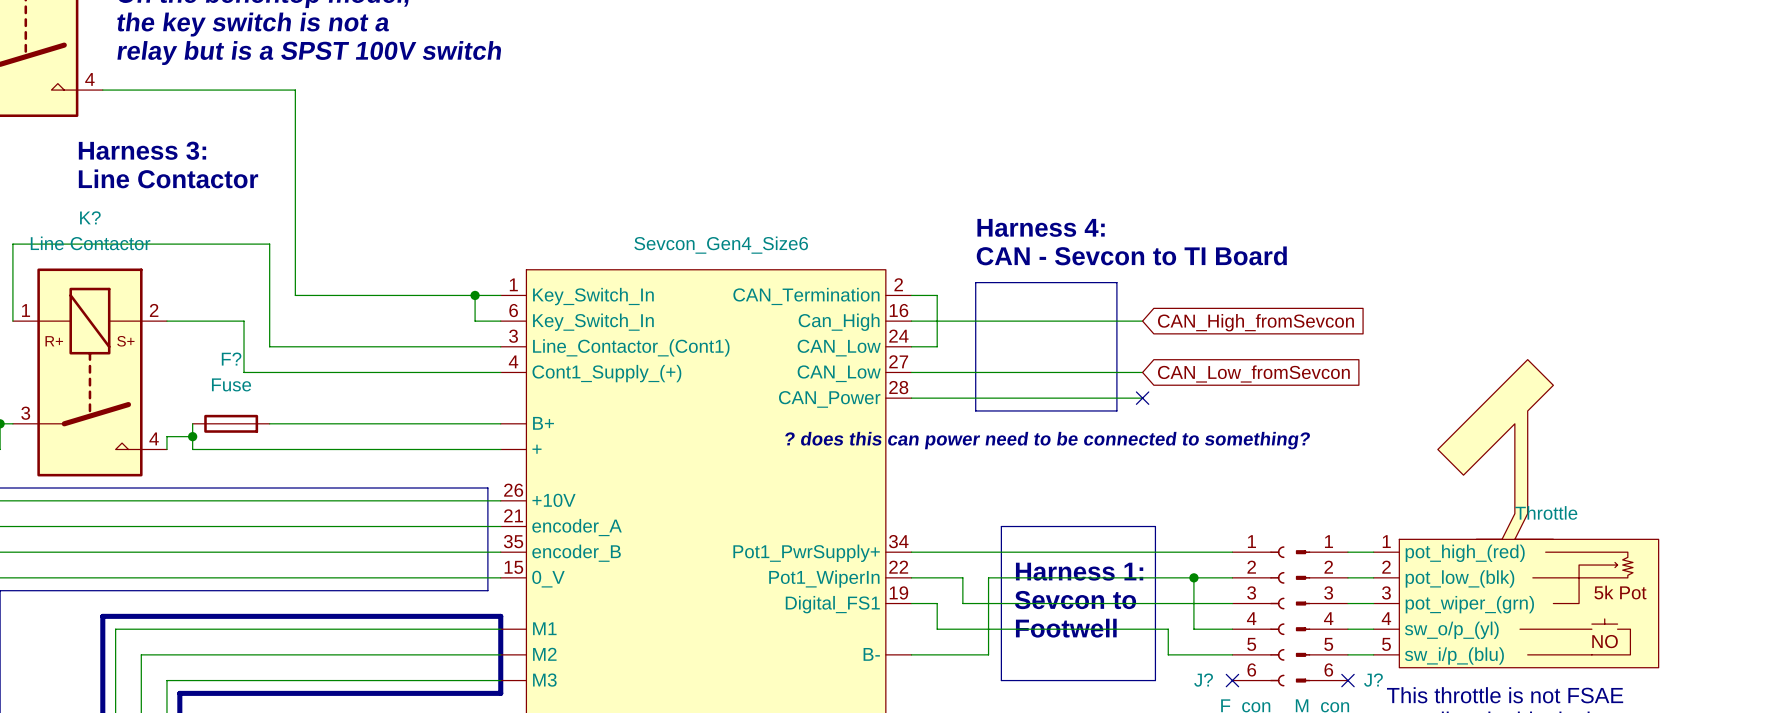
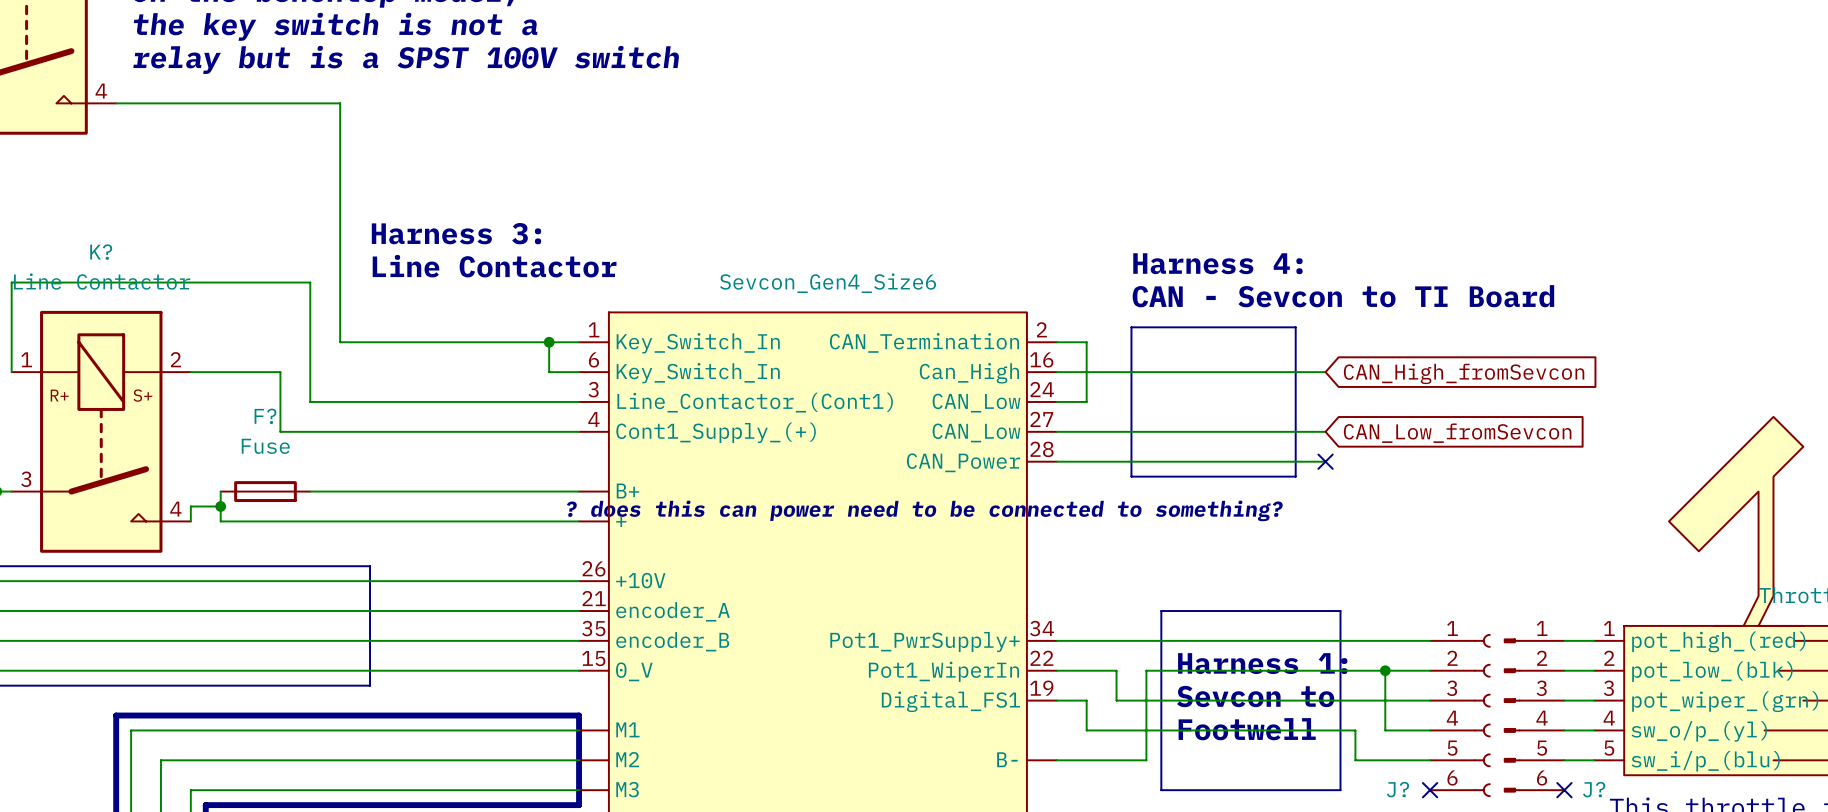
text position: Harness 3: (142, 150) -> Harness 3: (456, 233)
text position: Line Contactor (168, 178) -> Line Contactor (494, 266)
text: none -> ? does this can power need to be connected to something? (924, 510)
text: ? does this can power need to be connected to something? (1047, 440) -> none
line: (321, 488) (487, 488) (487, 590) (321, 590) -> (370, 566) (370, 685)

